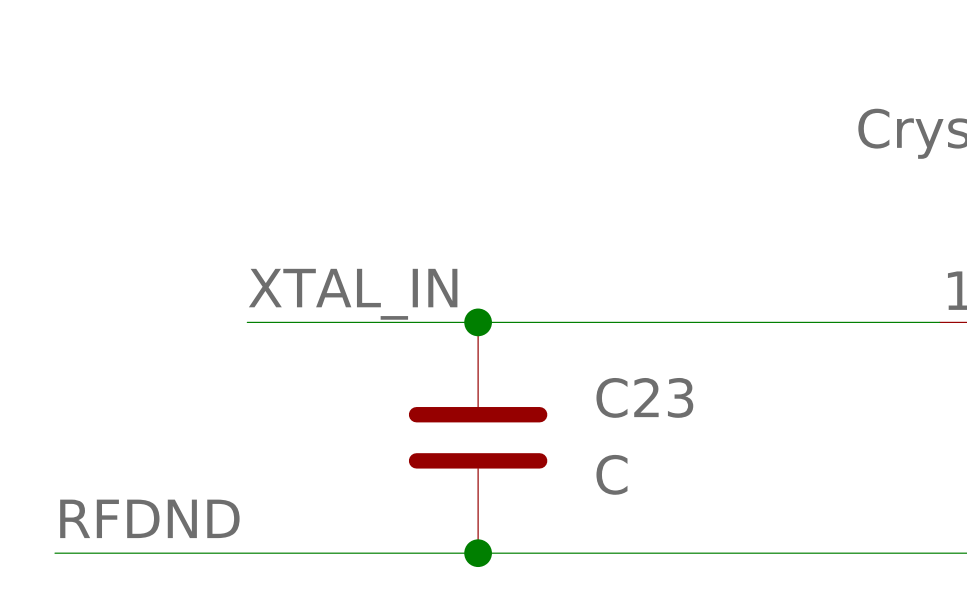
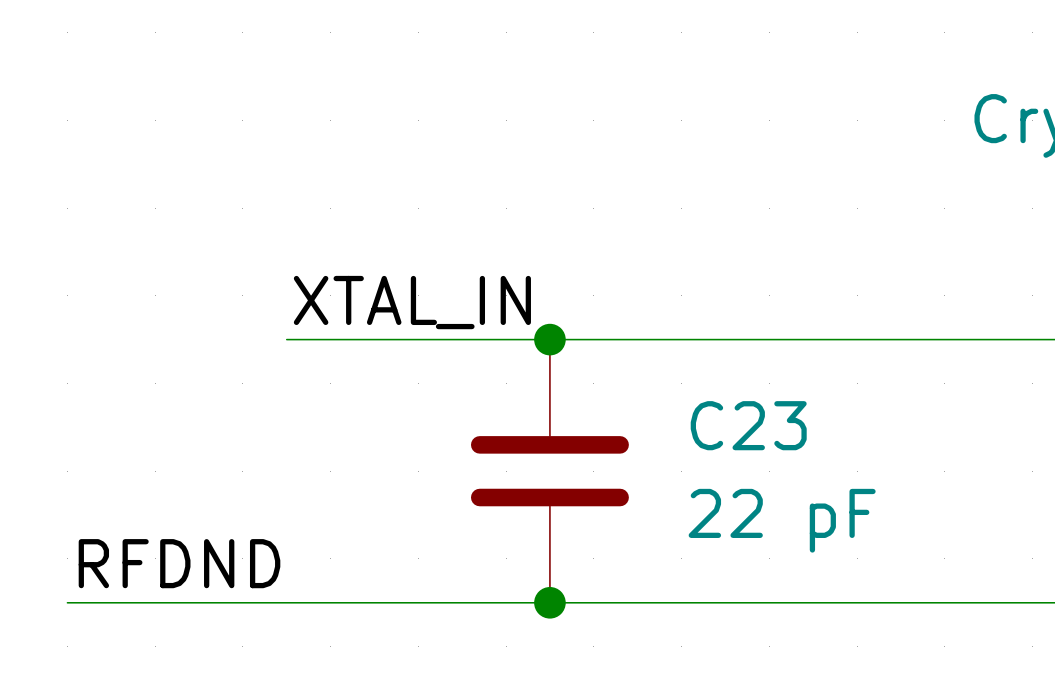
C23 value: C (611, 474) -> 22 pF (782, 520)

